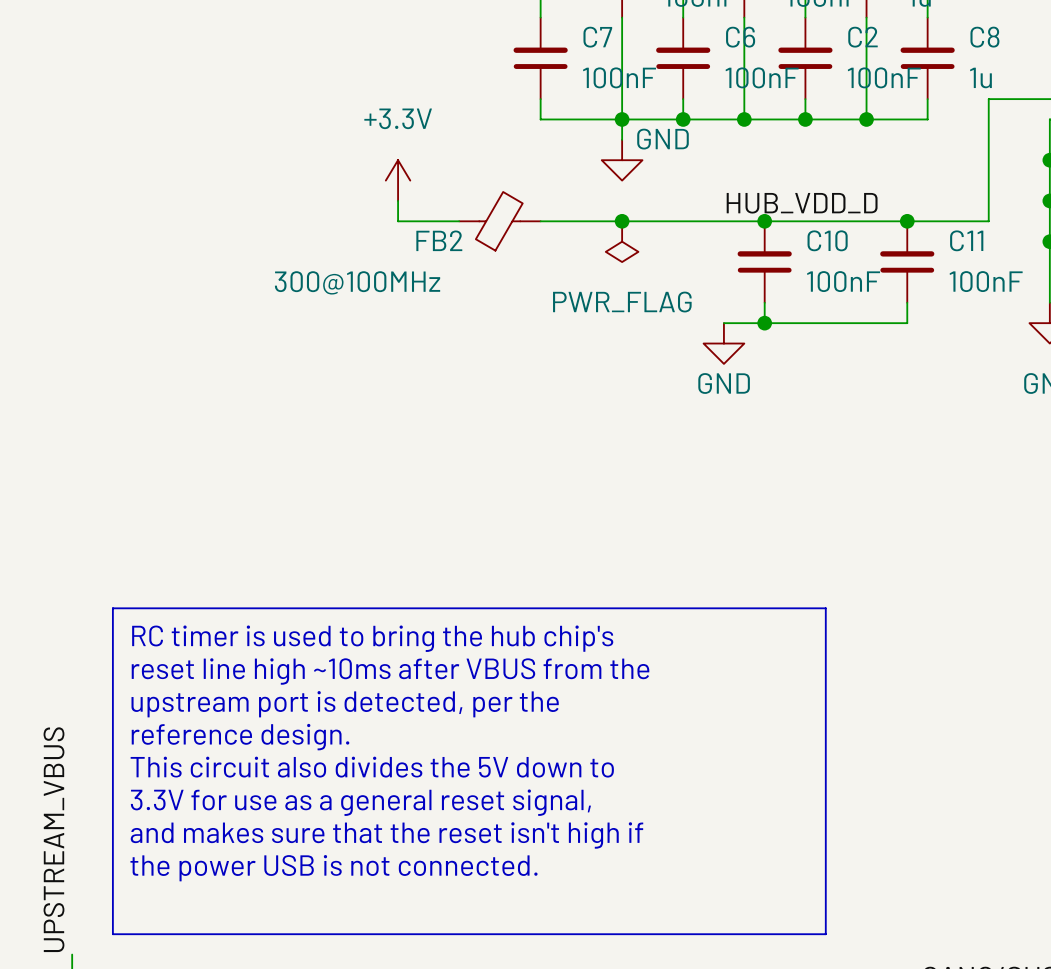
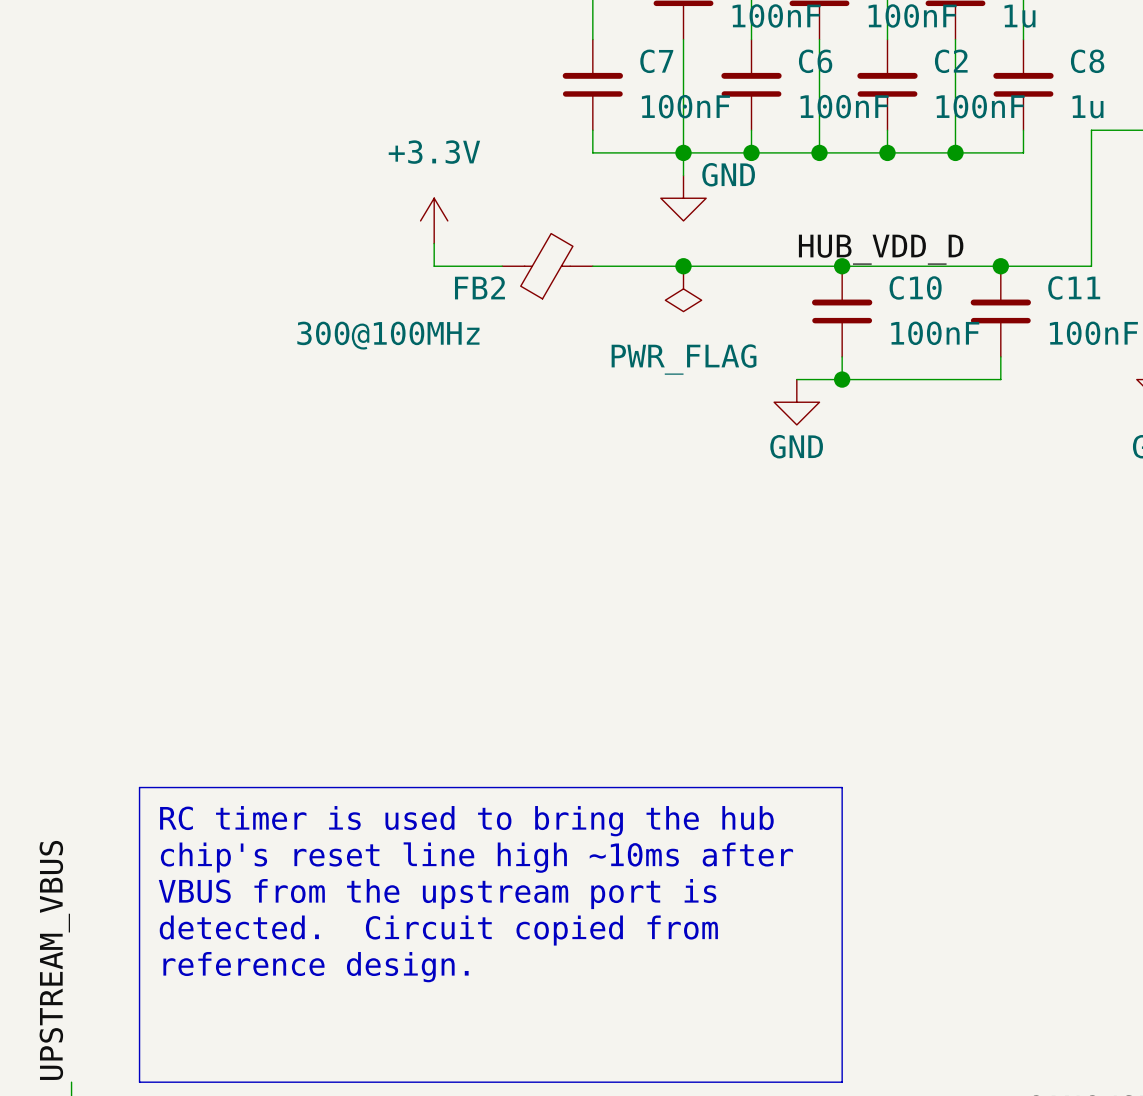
line: (112, 608) (825, 608) (825, 934) (112, 934) (112, 608) -> (139, 787) (139, 1082) (842, 1082) (842, 787) (139, 787)
text: RC timer is used to bring the hub chip's (372, 638) -> none
text: reset line high ~10ms after VBUS from the (390, 671) -> none
text: upstream port is detected, per the (345, 704) -> none
text: none -> RC timer is used to bring the hub (466, 821)
text position: reference design. (240, 737) -> reference design. (316, 967)
text: none -> chip's reset line high ~10ms after (476, 857)
text: This circuit also divides the 5V down to (372, 767) -> none
text: none -> VBUS from the upstream port is (437, 894)
text: 3.3V for use as a general reset signal, (360, 802) -> none
text: none -> detected. Circuit copied from (438, 930)
text: and makes sure that the reset isn't high if (386, 835) -> none
text: the power USB is not connected. (333, 868) -> none

